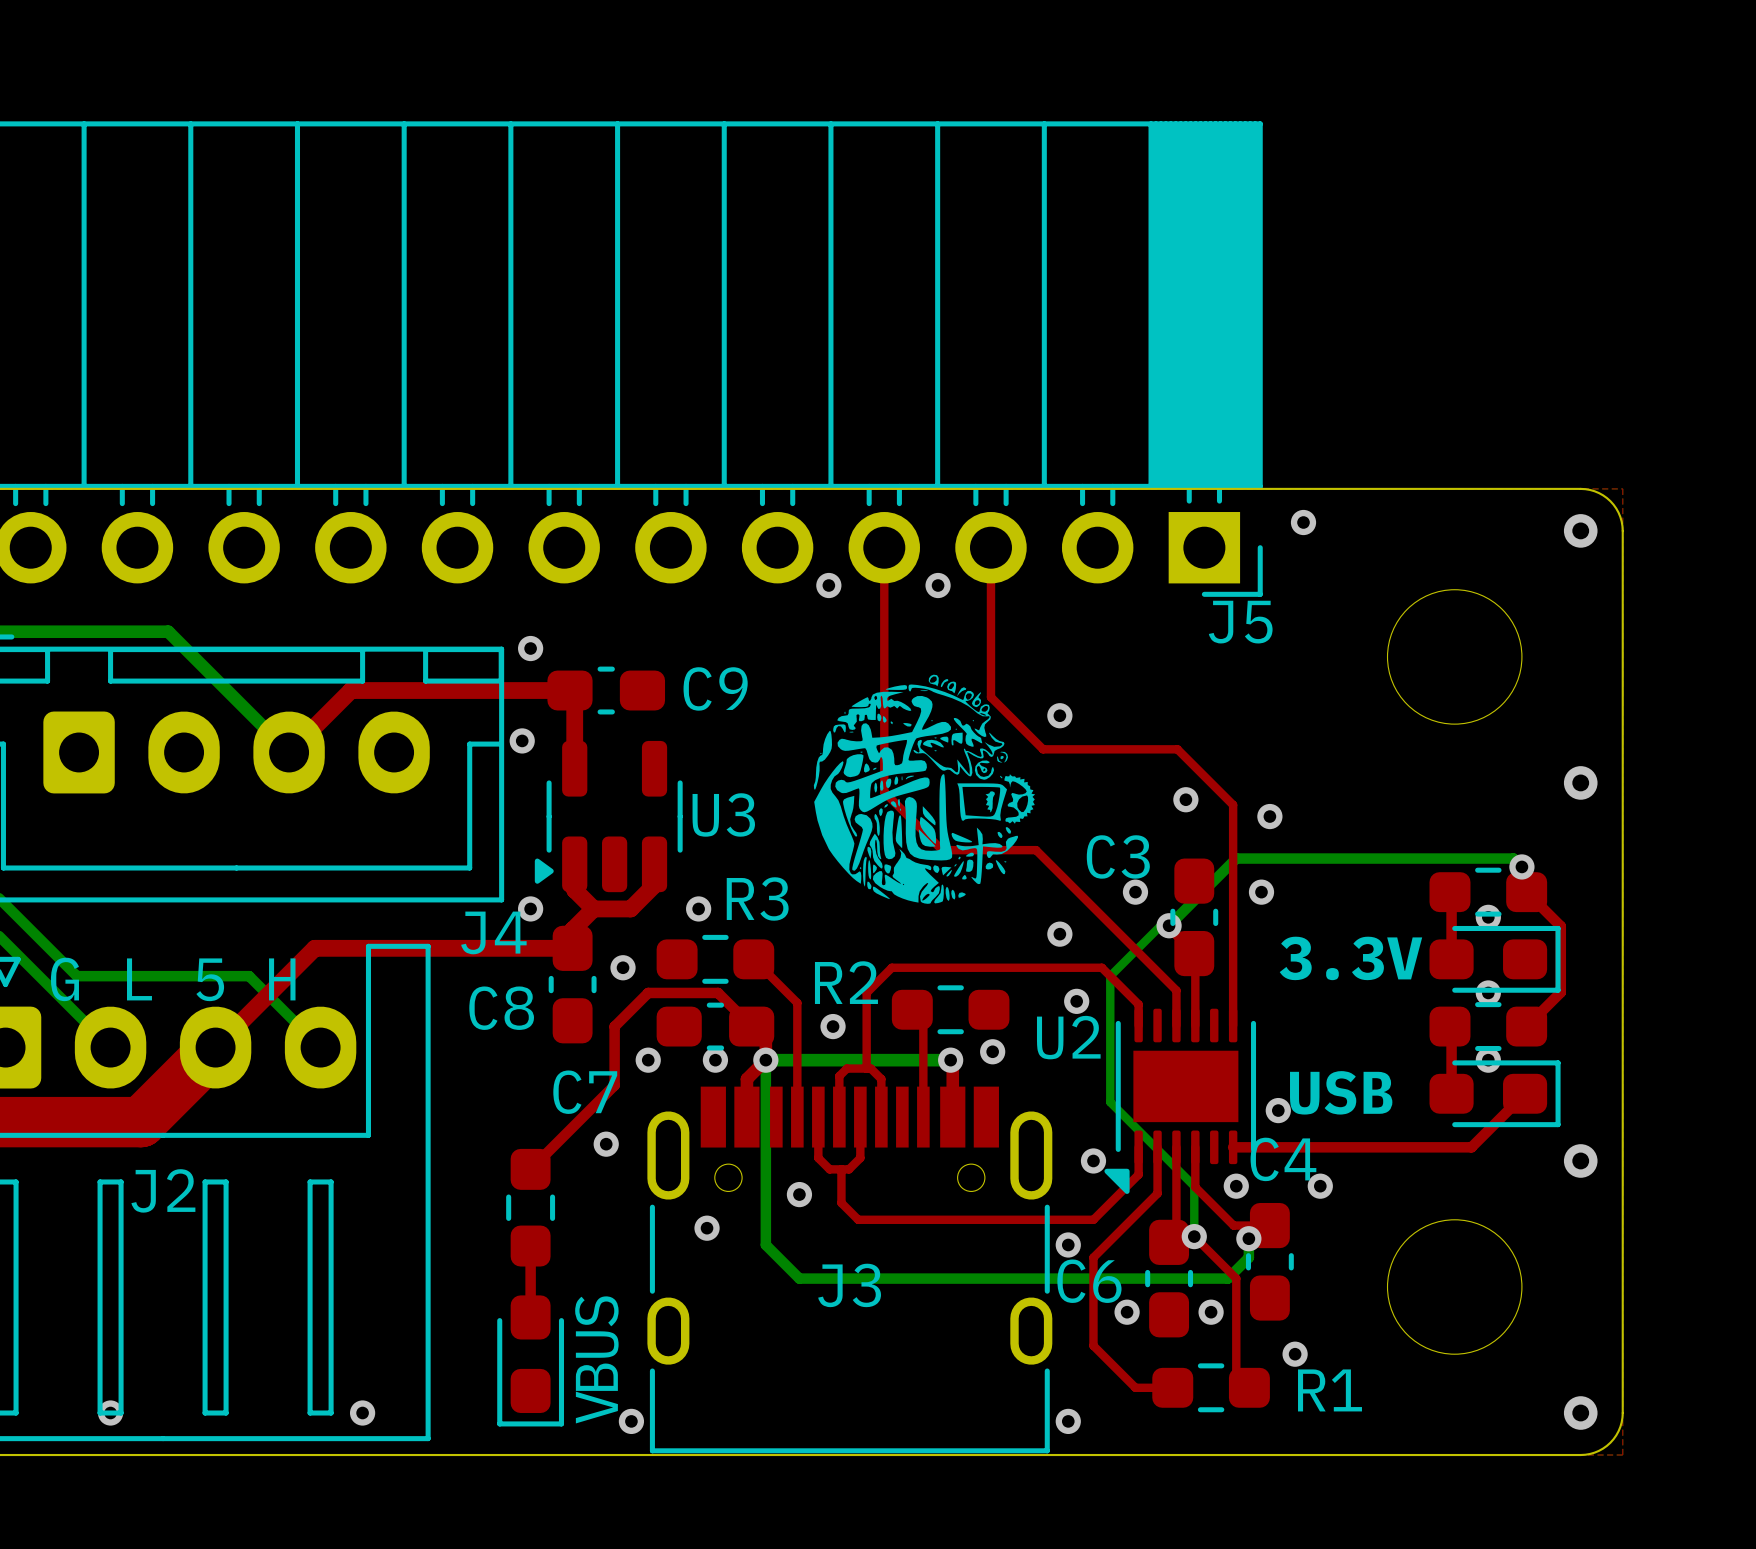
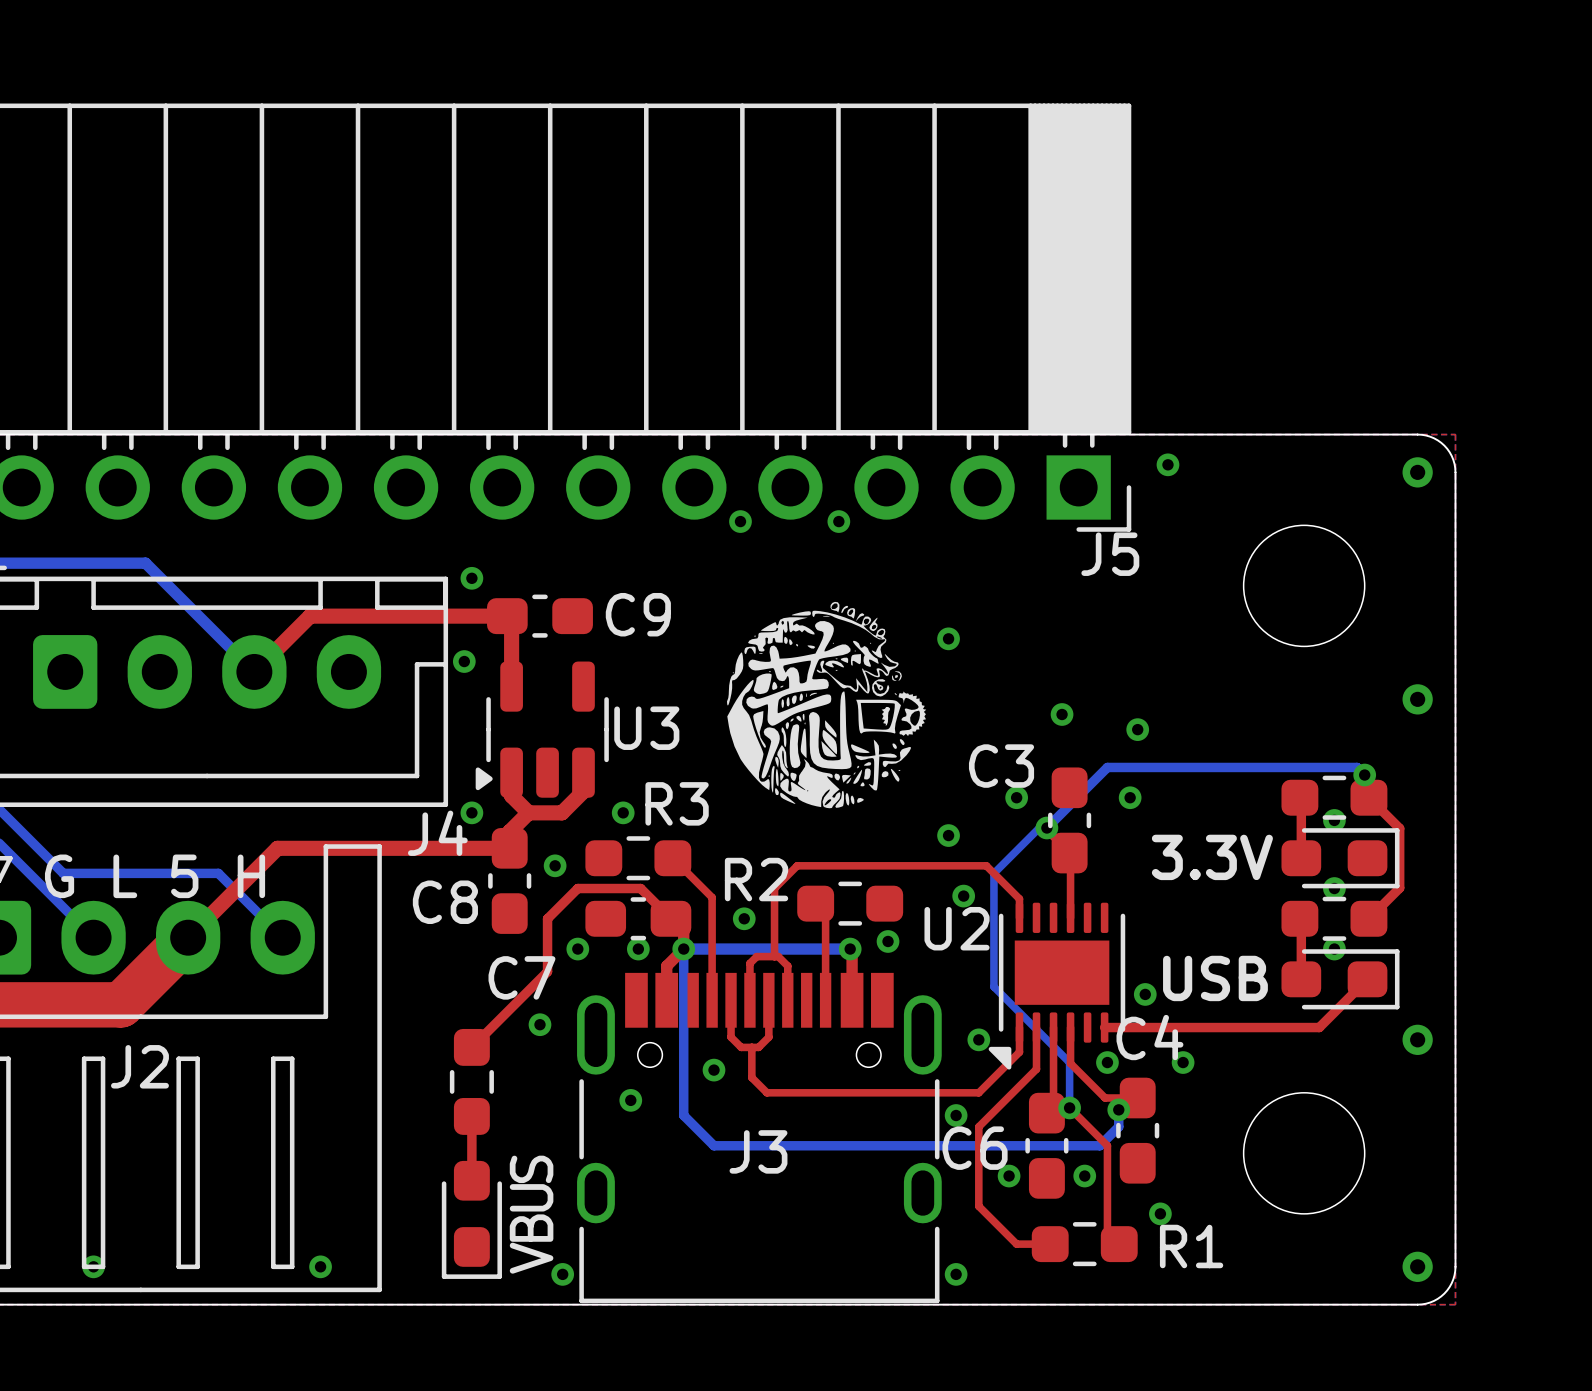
top track: (884, 547) (884, 792) (942, 850) (1036, 850) (1176, 990) (1176, 1025) -> none
top track: (990, 547) (990, 697) (1043, 749) (1177, 749) (1233, 804) (1233, 1025) -> none

